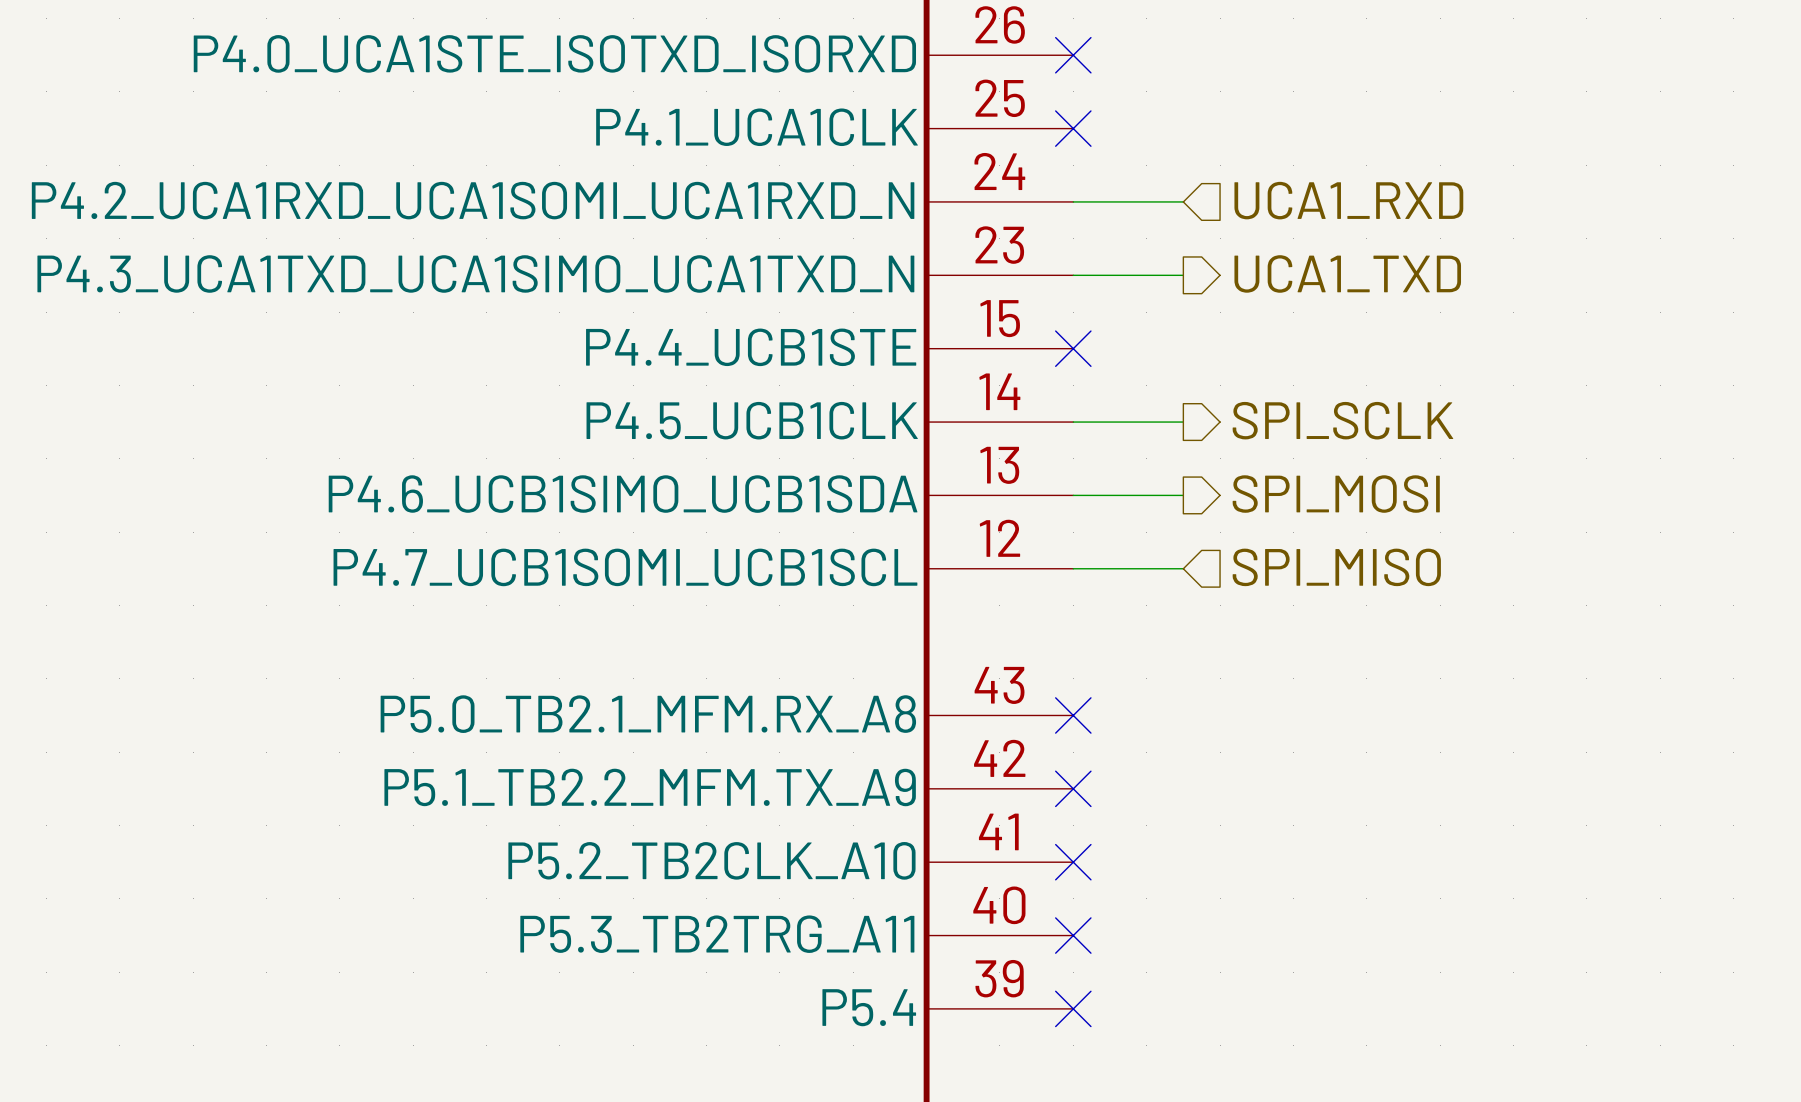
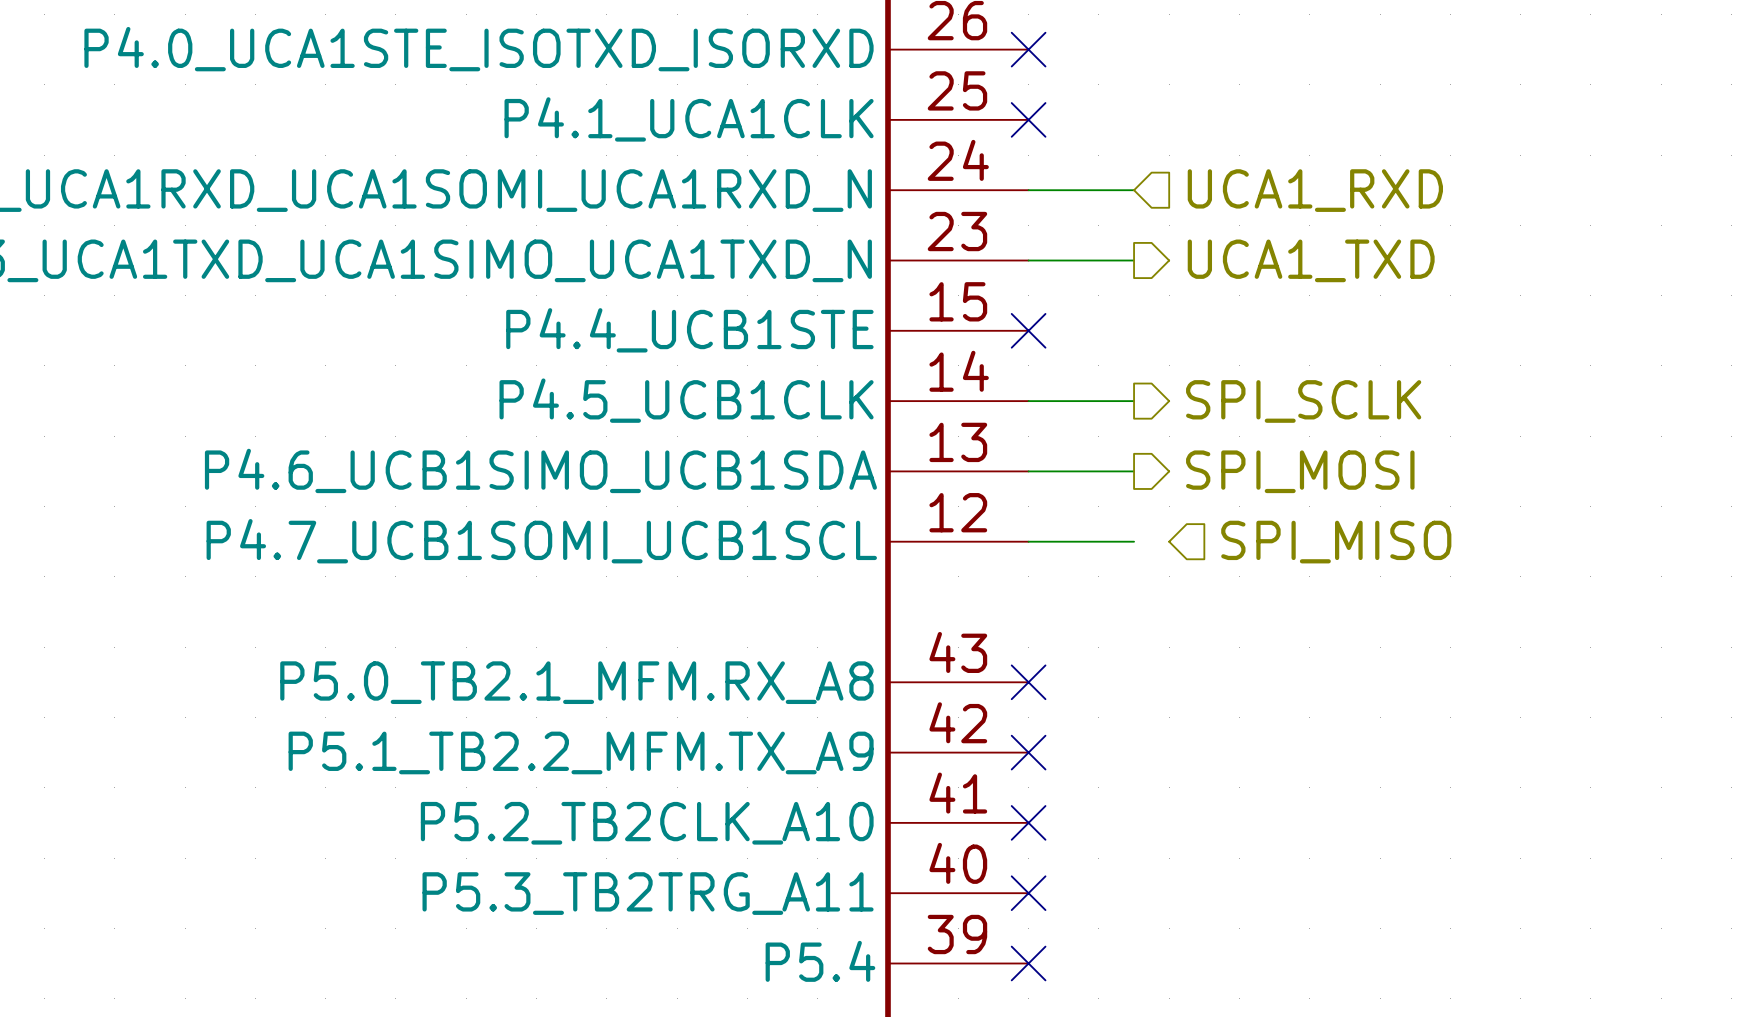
hierarchical label position: SPI_MISO (1336, 567) -> SPI_MISO (1336, 542)

